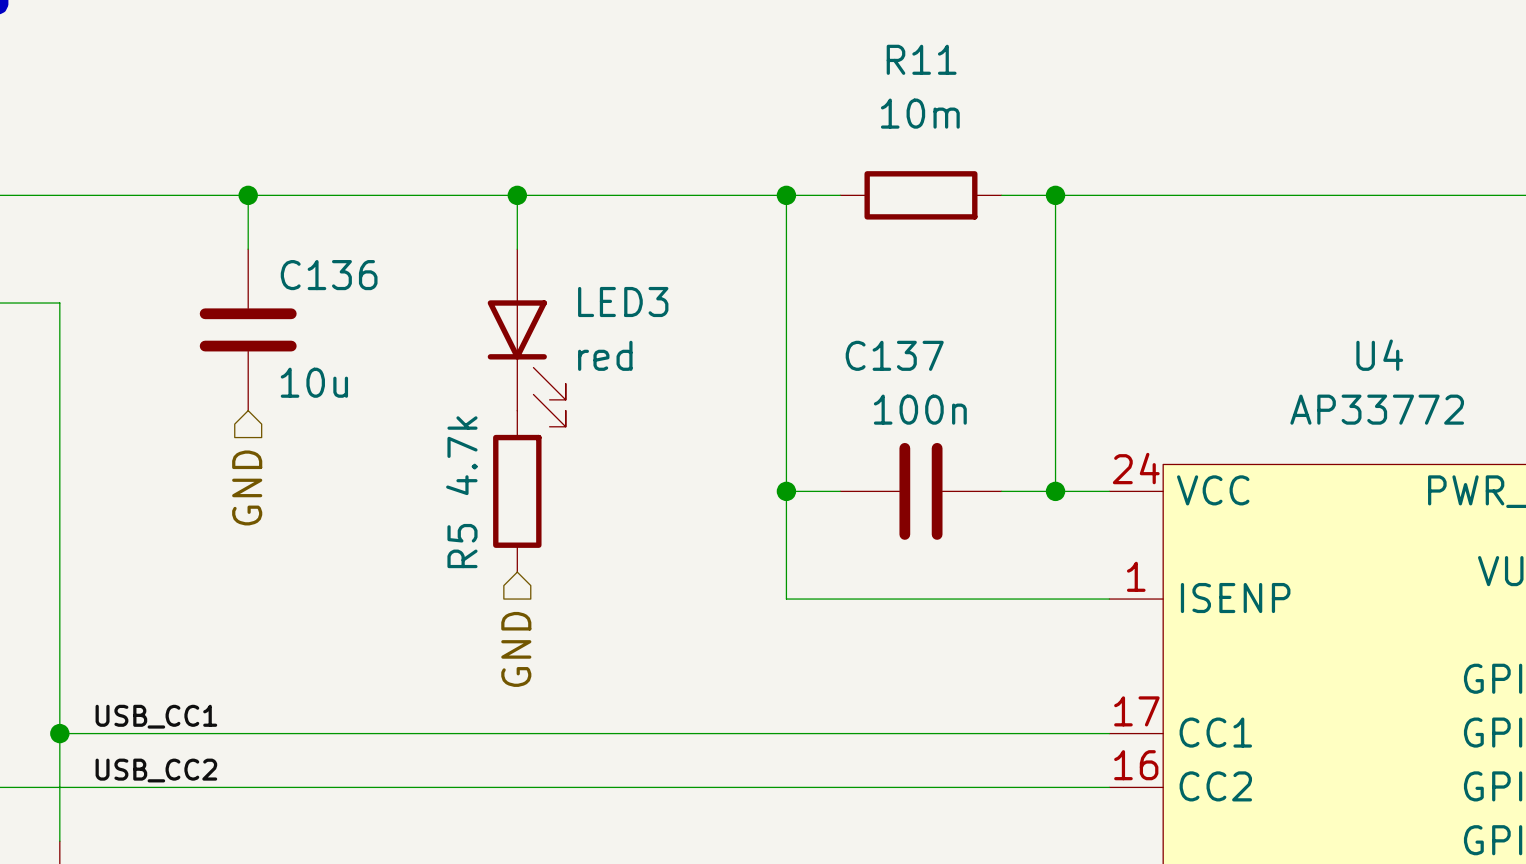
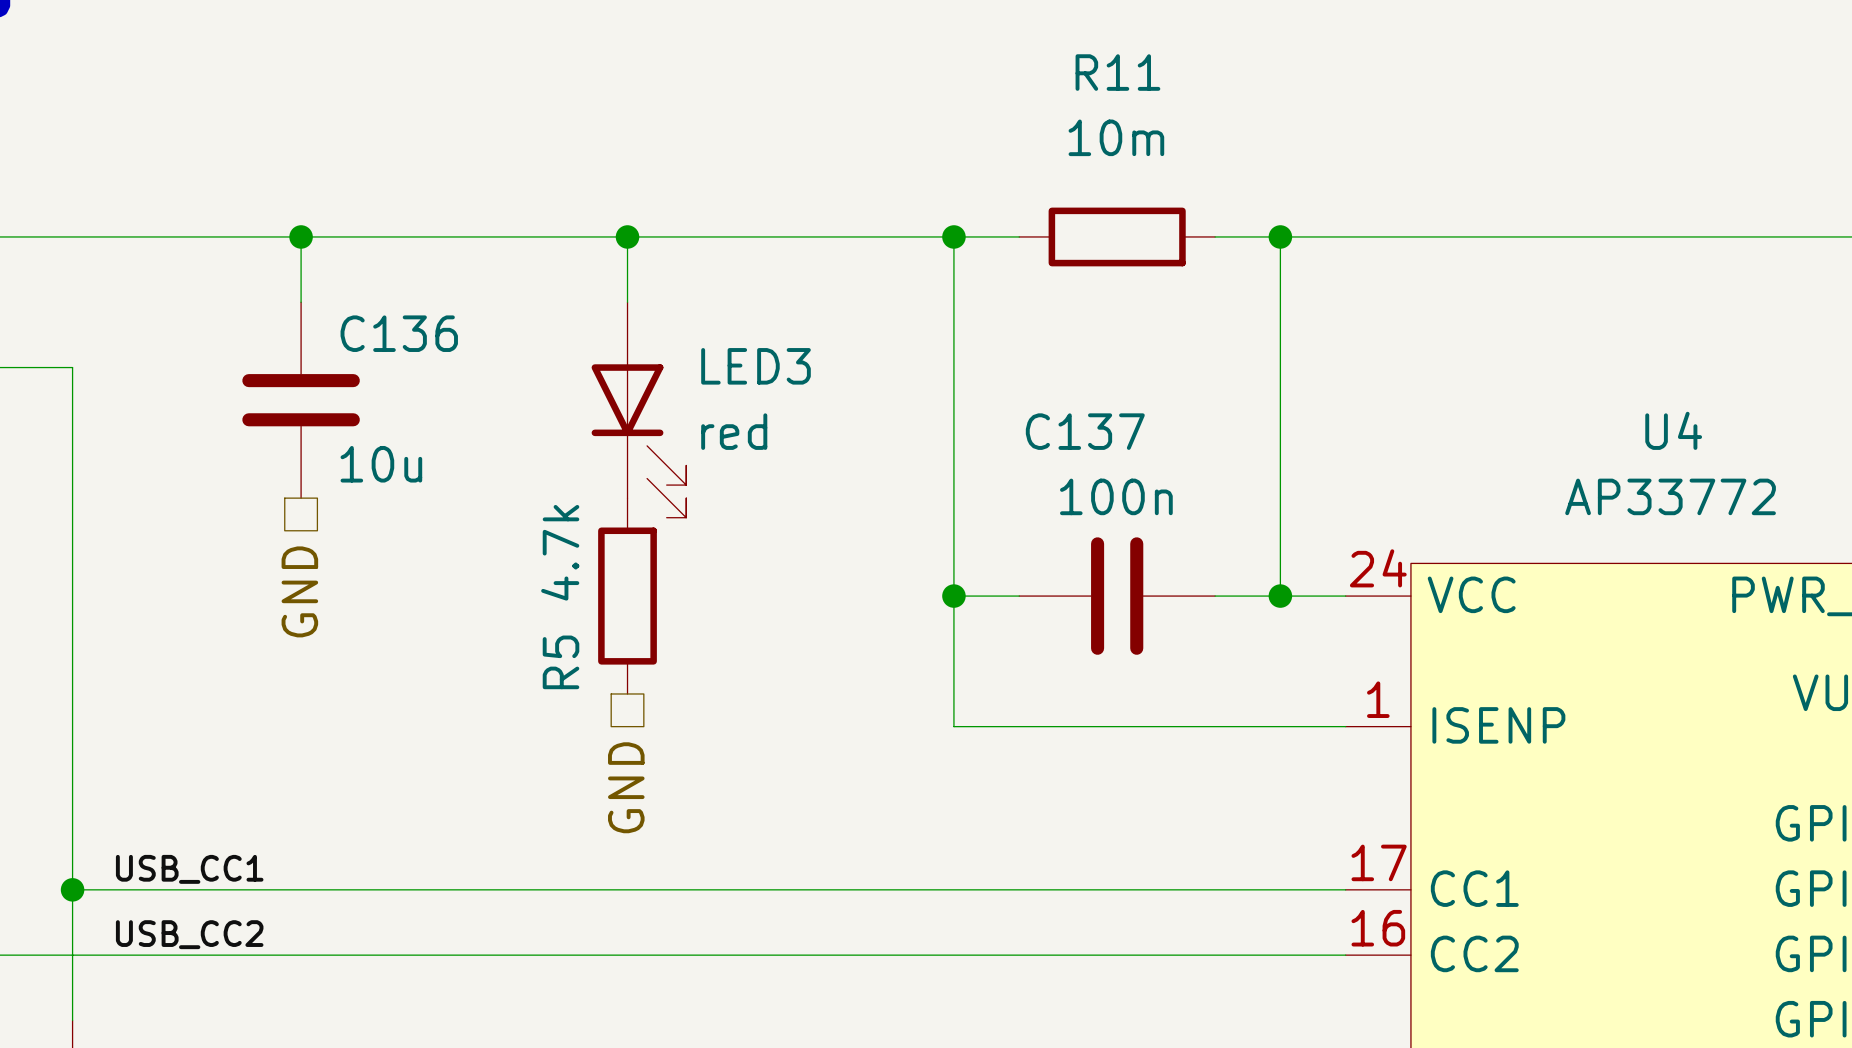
hierarchical label shape: input (247, 487) -> passive (299, 591)
hierarchical label shape: input (516, 649) -> passive (626, 787)

